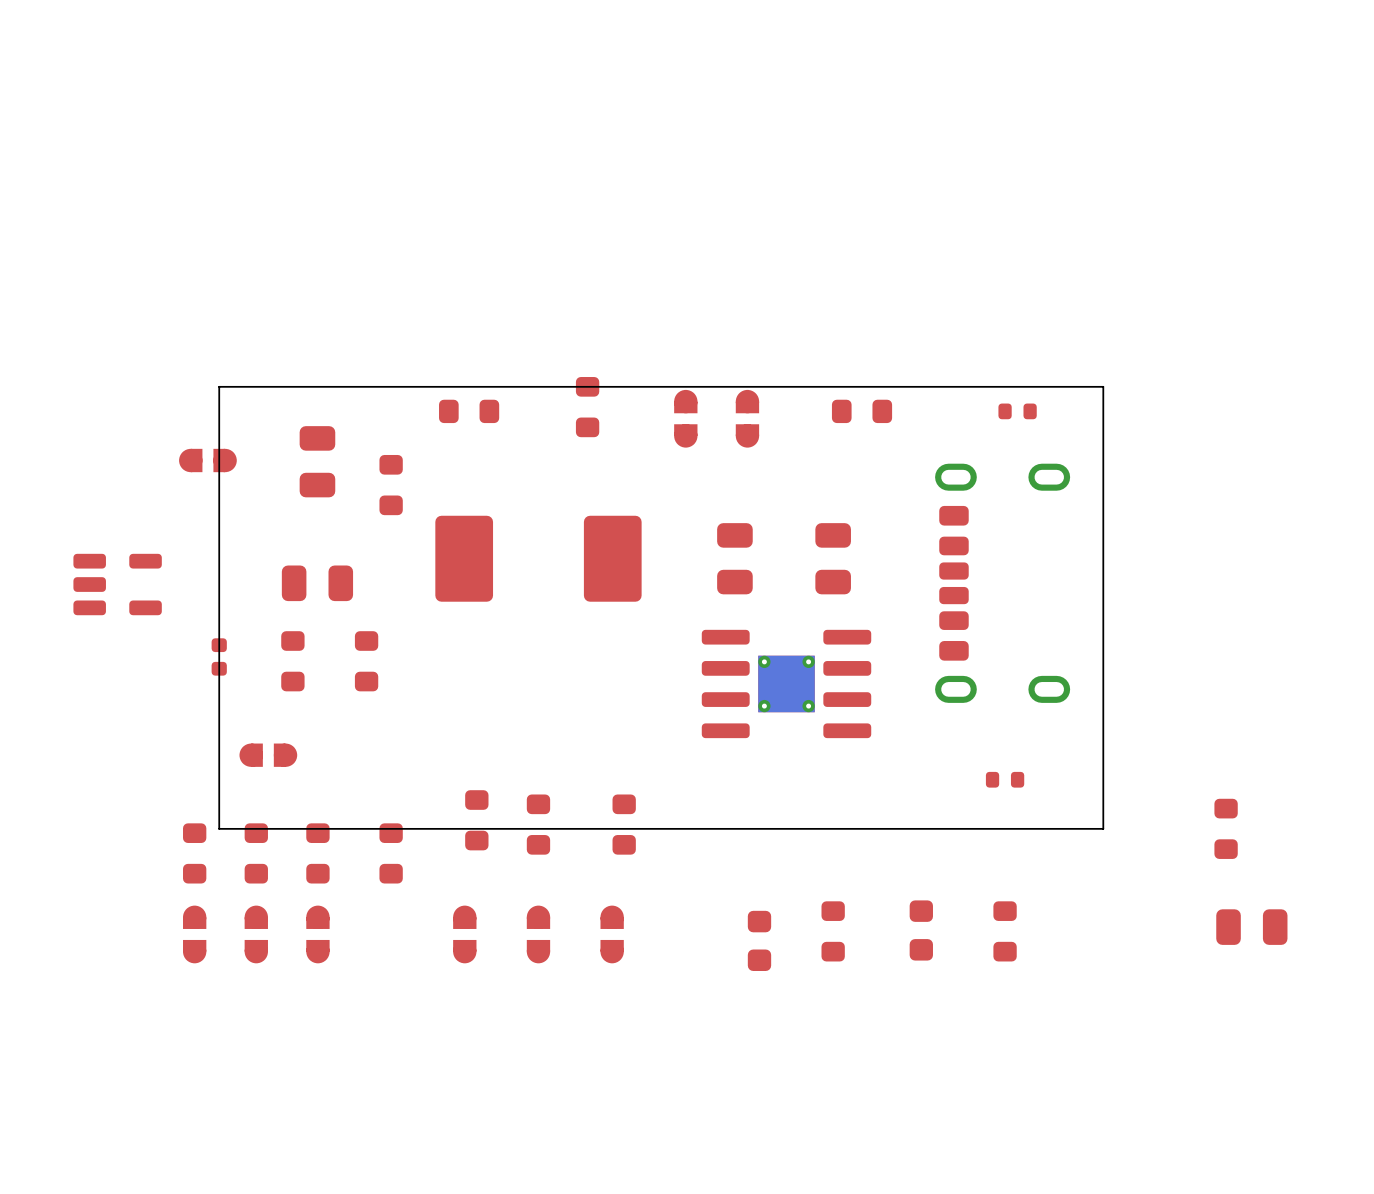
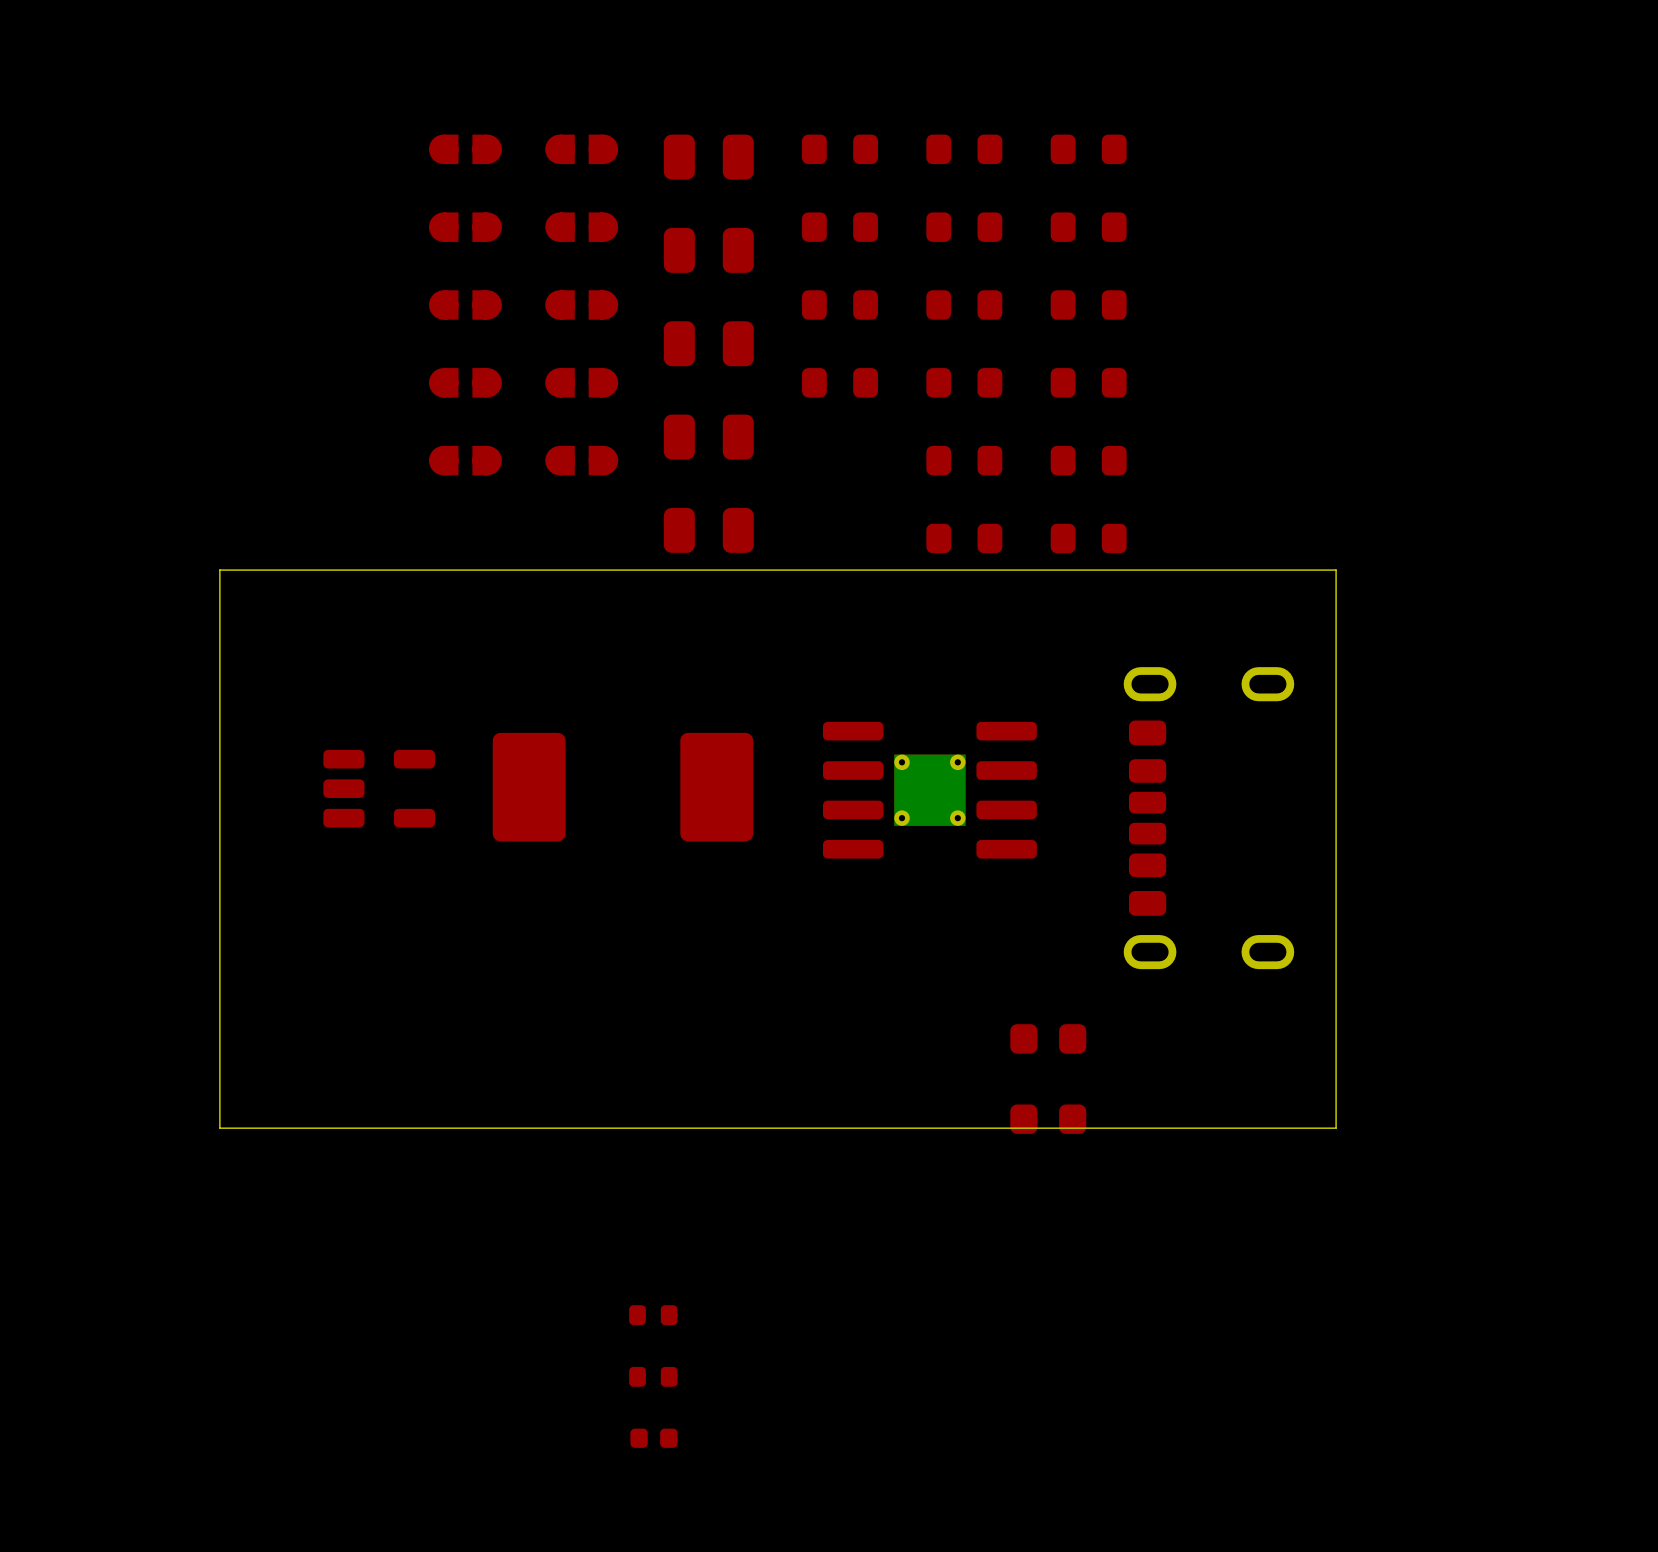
part: none -> (465, 149)
part: none -> (581, 149)
part: none -> (839, 149)
part: none -> (964, 149)
part: none -> (1088, 149)
part: none -> (708, 157)
part: none -> (465, 227)
part: none -> (581, 227)
part: none -> (839, 227)
part: none -> (964, 227)
part: none -> (1088, 227)
part: none -> (708, 250)
part: none -> (465, 304)
part: none -> (581, 304)
part: none -> (839, 304)
part: none -> (964, 304)
part: none -> (1088, 304)
part: none -> (708, 343)
part: none -> (465, 382)
part: none -> (581, 382)
part: none -> (839, 382)
part: none -> (964, 382)
part: none -> (1088, 382)
part: none -> (708, 437)
part: none -> (465, 460)
part: none -> (581, 460)
part: none -> (964, 460)
part: none -> (1088, 460)
part: none -> (708, 530)
part: none -> (964, 538)
part: none -> (1088, 538)
part: (587, 407) -> none
part: (469, 411) -> none
part: (862, 411) -> none
part: (1017, 411) -> none
part: (685, 418) -> none
part: (747, 418) -> none
part: (207, 460) -> none
part: (317, 461) -> none
part: (391, 485) -> none
part: (734, 558) -> none
part: (833, 558) -> none
part: (317, 583) -> none
part position: (117, 584) -> (379, 788)
part rotation: 0° (219, 656) -> 90° clockwise (653, 1438)
part position: (219, 656) -> (653, 1438)
part: (292, 661) -> none
part: (366, 661) -> none
part position: (786, 683) -> (929, 790)
part: (268, 755) -> none
part: none -> (1048, 1038)
part: (1005, 779) -> none
part: (476, 820) -> none
part: none -> (1048, 1119)
part: (538, 824) -> none
part: (624, 824) -> none
part: (1226, 828) -> none
part: (194, 853) -> none
part: (256, 853) -> none
part: (317, 853) -> none
part: (391, 853) -> none
part: (1251, 927) -> none
part: (921, 930) -> none
part: (833, 931) -> none
part: (1005, 931) -> none
part: (194, 934) -> none
part: (256, 934) -> none
part: (317, 934) -> none
part: (464, 934) -> none
part: (538, 934) -> none
part: (612, 934) -> none
part: (759, 940) -> none
part: none -> (653, 1315)
part: none -> (653, 1376)

